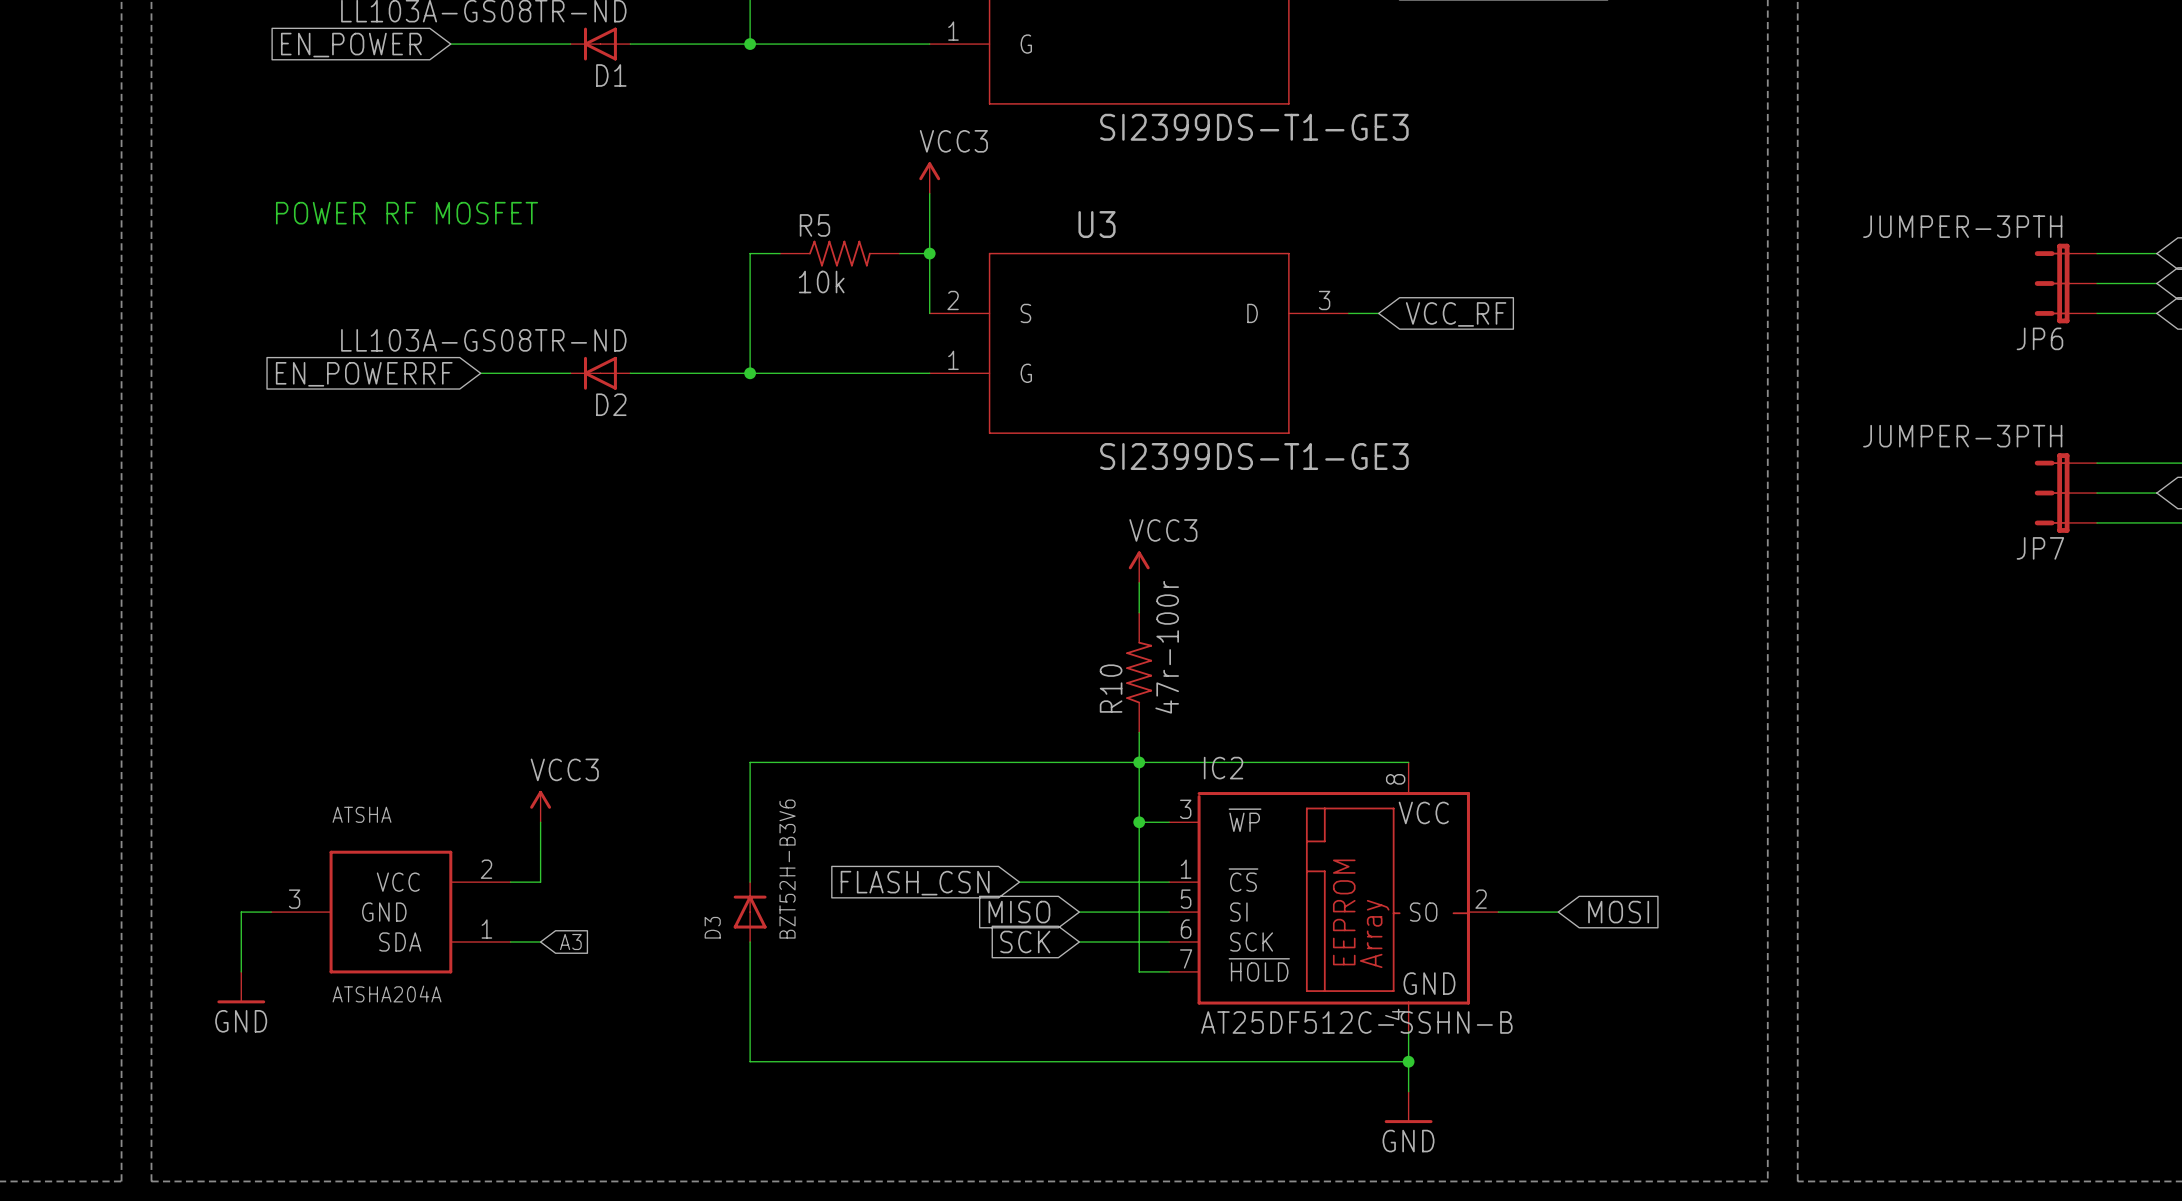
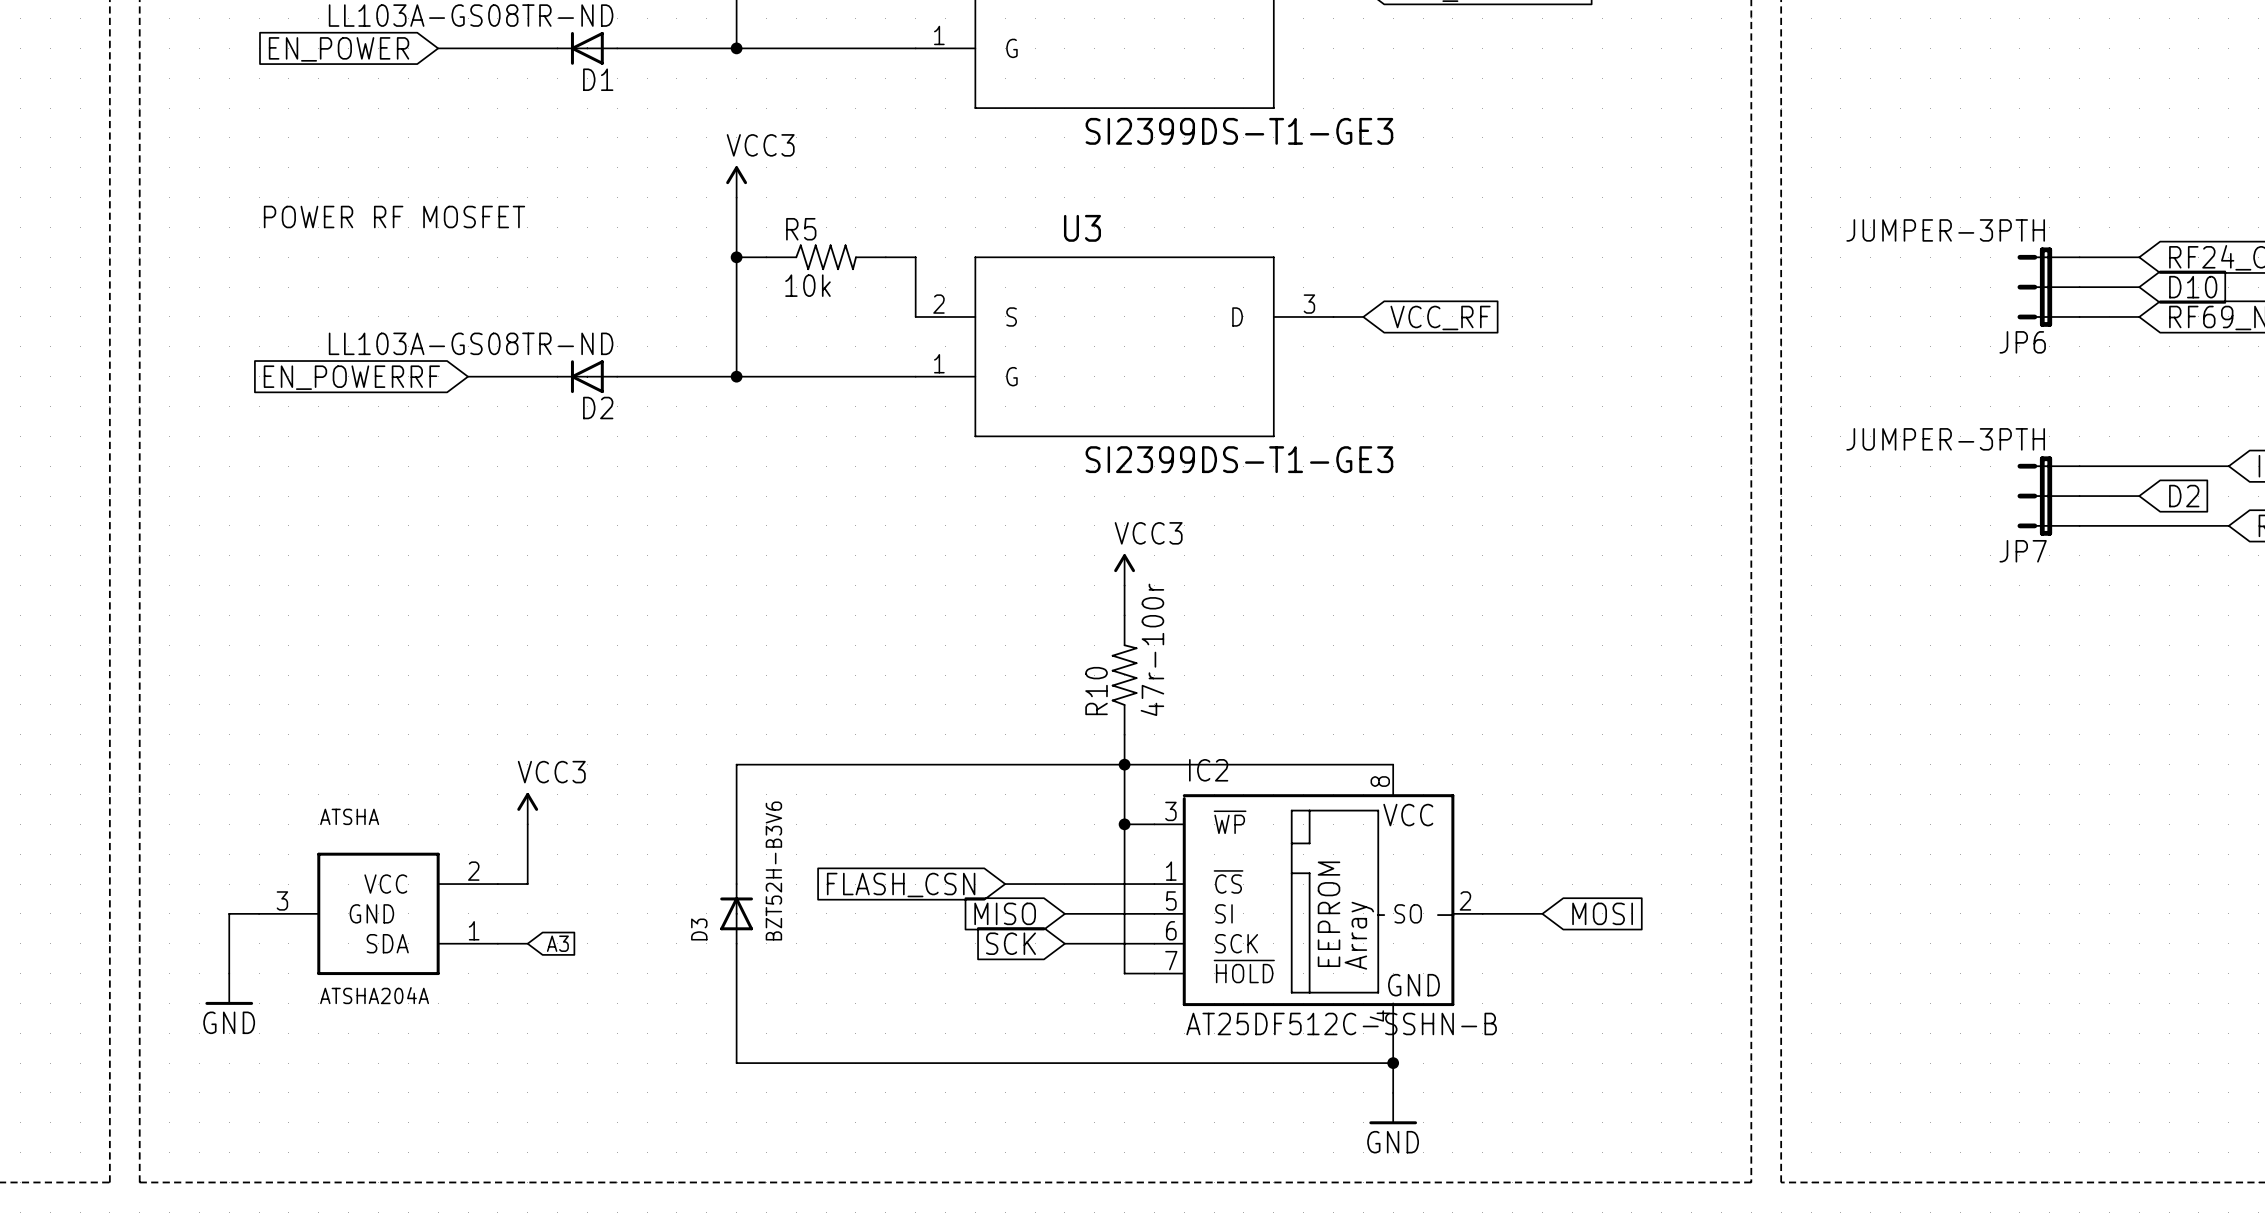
power symbol position: VCC3 (929, 178) -> VCC3 (736, 181)
wire: (929, 193) (929, 253) -> (736, 197) (736, 257)
junction: none -> (736, 257)
junction: (929, 253) -> none

